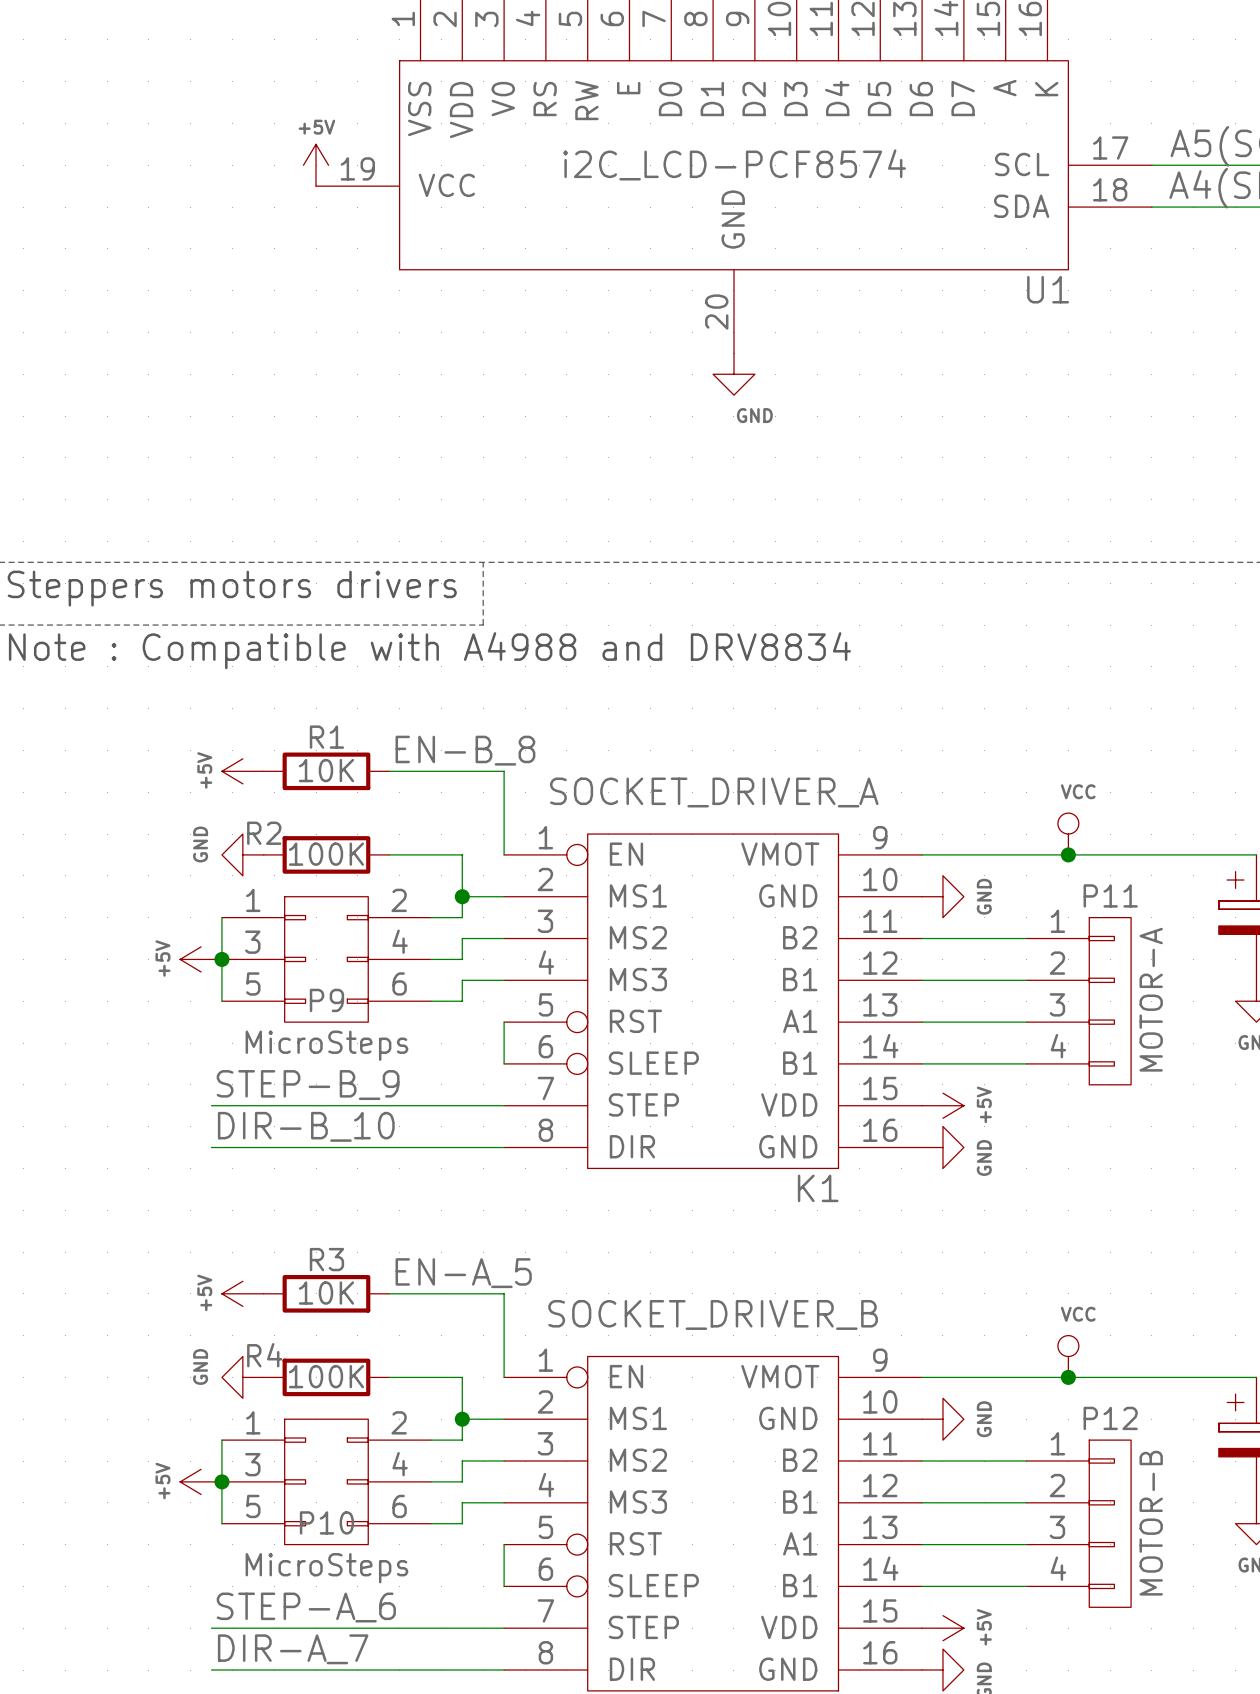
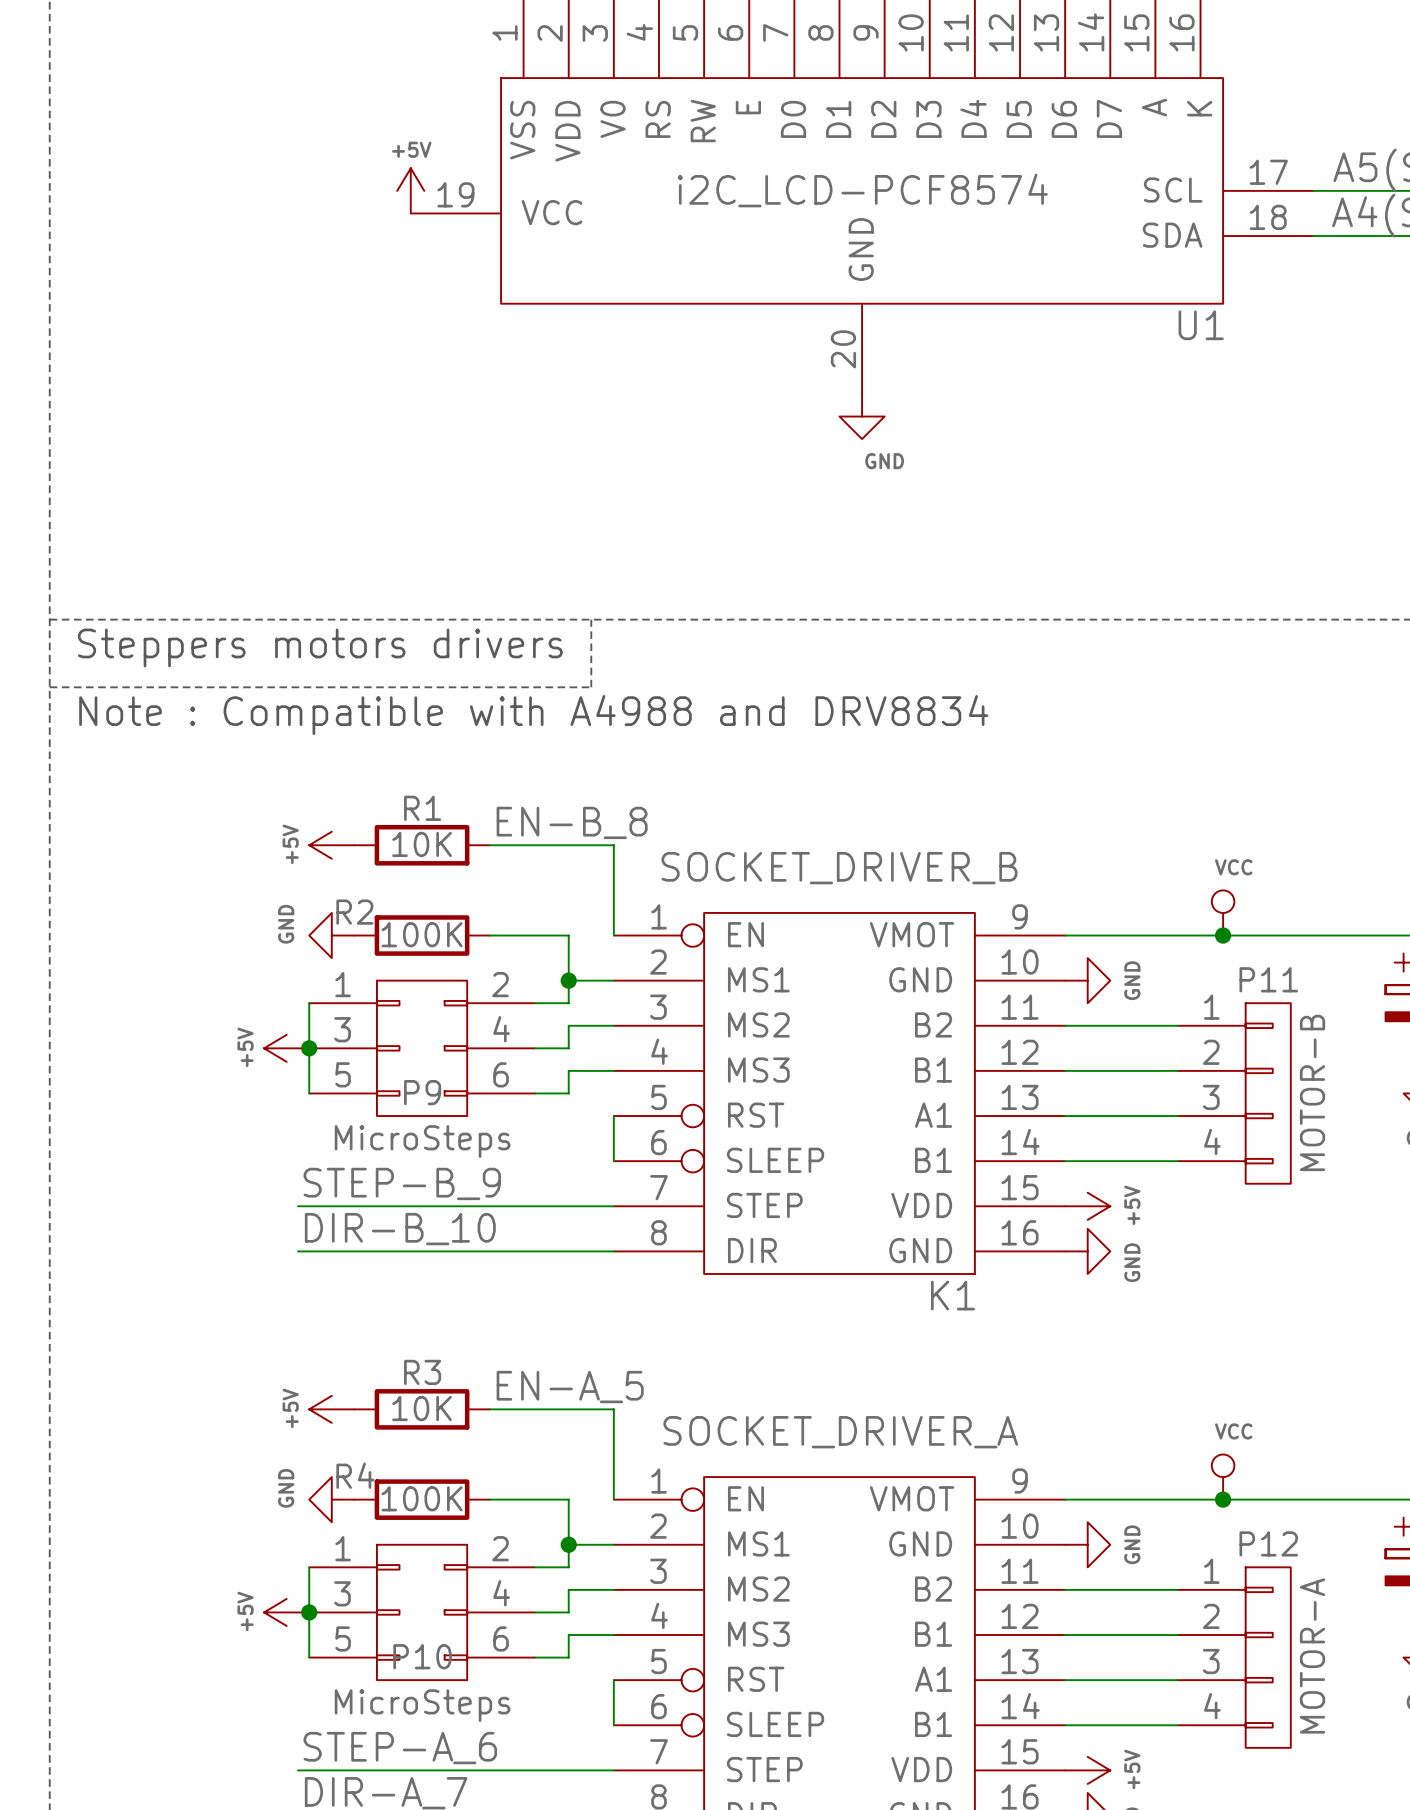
K1 value: SOCKET_DRIVER_A (714, 792) -> SOCKET_DRIVER_B (839, 868)
P11 value: MOTOR-A (1151, 999) -> MOTOR-B (1312, 1092)
part value: SOCKET_DRIVER_B (713, 1314) -> SOCKET_DRIVER_A (840, 1432)
P12 value: MOTOR-B (1151, 1523) -> MOTOR-A (1312, 1655)

